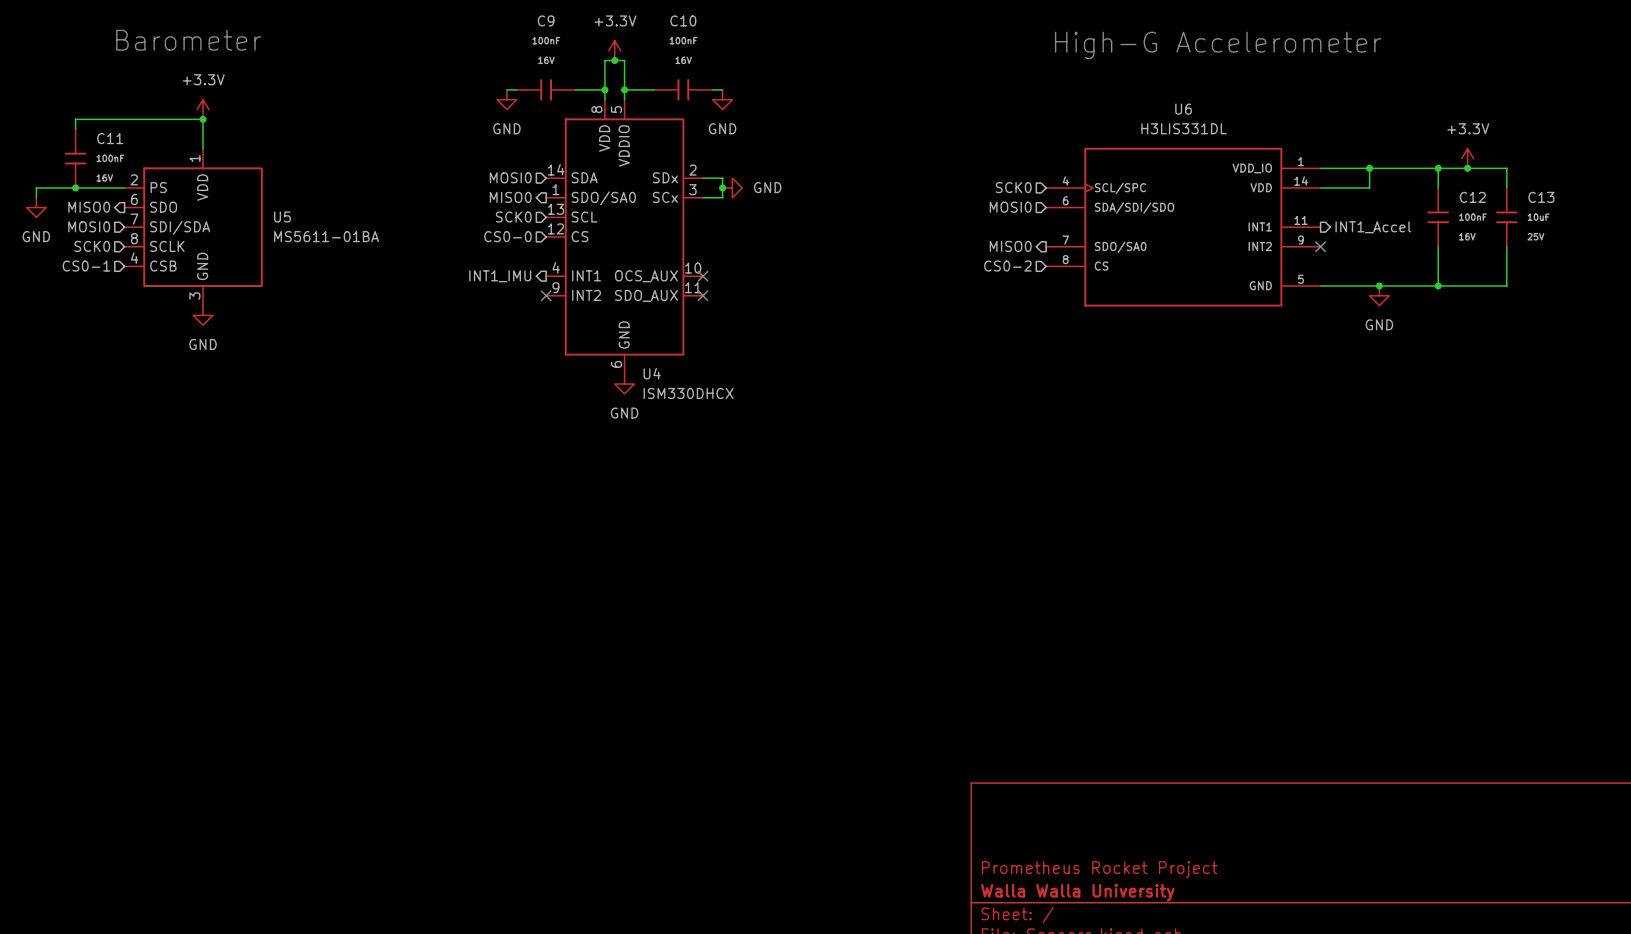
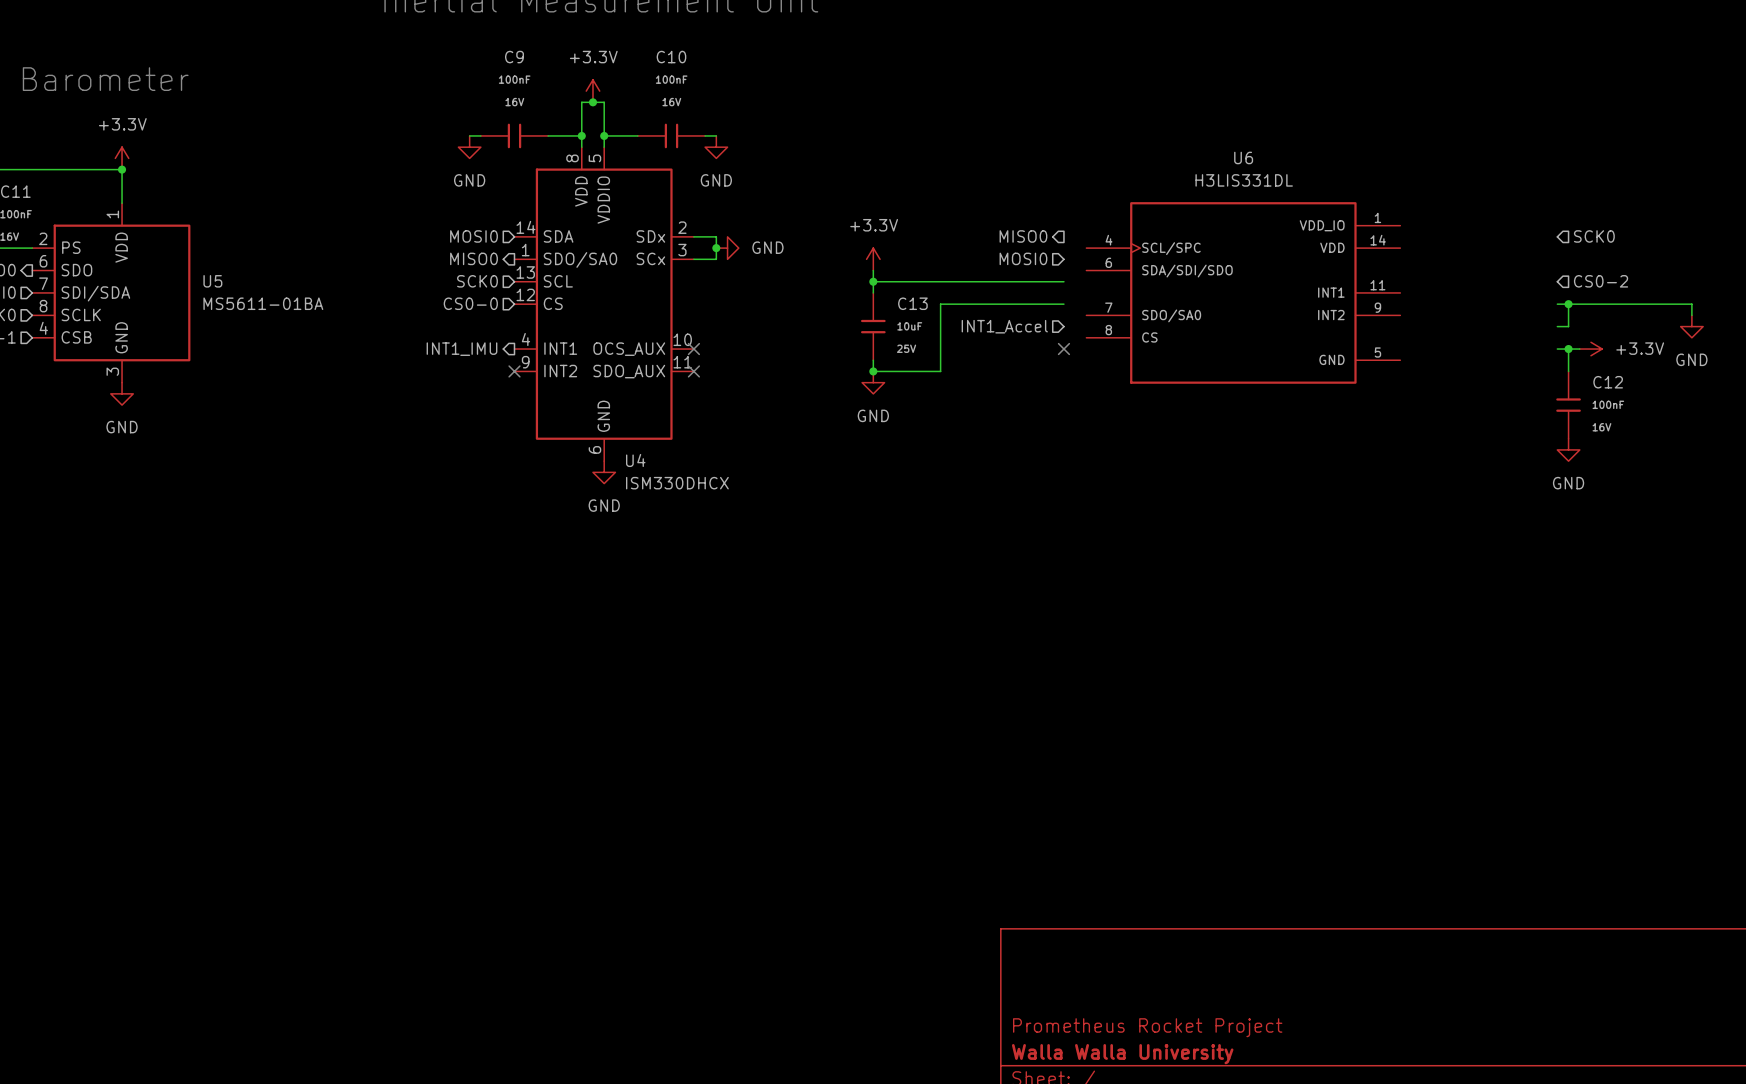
text: High-G Accelerometer (1218, 45) -> none
power symbol text position: +3.3V (1468, 128) -> +3.3V (1640, 348)
power symbol rotation: 0° (1467, 158) -> 90° clockwise (1590, 349)
power symbol position: +3.3V (1467, 158) -> +3.3V (1590, 349)
wire: (1320, 168) (1506, 168) (1506, 187) -> none
wire: (1369, 168) (1369, 187) (1320, 187) -> none
junction: (1369, 168) -> none
wire: (1438, 168) (1438, 187) -> (1568, 349) (1568, 371)
junction: (1438, 168) -> none
junction: (1467, 168) -> none
hierarchical label: none -> SCK0 (1594, 236)
hierarchical label: SCK0 (1013, 187) -> none
power symbol: none -> +3.3V (873, 259)
wire: none -> (873, 270) (873, 292)
hierarchical label position: MOSI0 (1010, 207) -> MOSI0 (1023, 258)
wire: none -> (873, 281) (1063, 281)
junction: none -> (873, 281)
C12 position: (1438, 217) -> (1568, 405)
hierarchical label: none -> CS0-2 (1601, 281)
C13 position: (1506, 217) -> (873, 326)
hierarchical label: INT1_Accel (1373, 227) -> none
wire: none -> (1063, 304) (940, 304) (940, 371) (873, 371) (873, 360)
wire: none -> (1557, 304) (1691, 304) (1691, 315)
wire: none -> (1568, 304) (1568, 326) (1557, 326)
junction: none -> (1568, 304)
hierarchical label position: MISO0 (1010, 246) -> MISO0 (1023, 236)
no-connect mark: (1320, 246) -> none
wire: (1438, 246) (1438, 285) -> none
wire: (1506, 246) (1506, 285) (1320, 285) -> none
hierarchical label: none -> INT1_Accel (1004, 326)
power symbol: none -> GND (1691, 326)
hierarchical label: CS0-2 (1007, 266) -> none
no-connect mark: none -> (1063, 349)
wire: none -> (1557, 349) (1579, 349)
junction: none -> (1568, 349)
junction: (1379, 285) -> none
junction: (1438, 285) -> none
junction: none -> (873, 371)
power symbol: GND (1379, 295) -> none
power symbol: none -> GND (873, 382)
power symbol: none -> GND (1568, 449)

